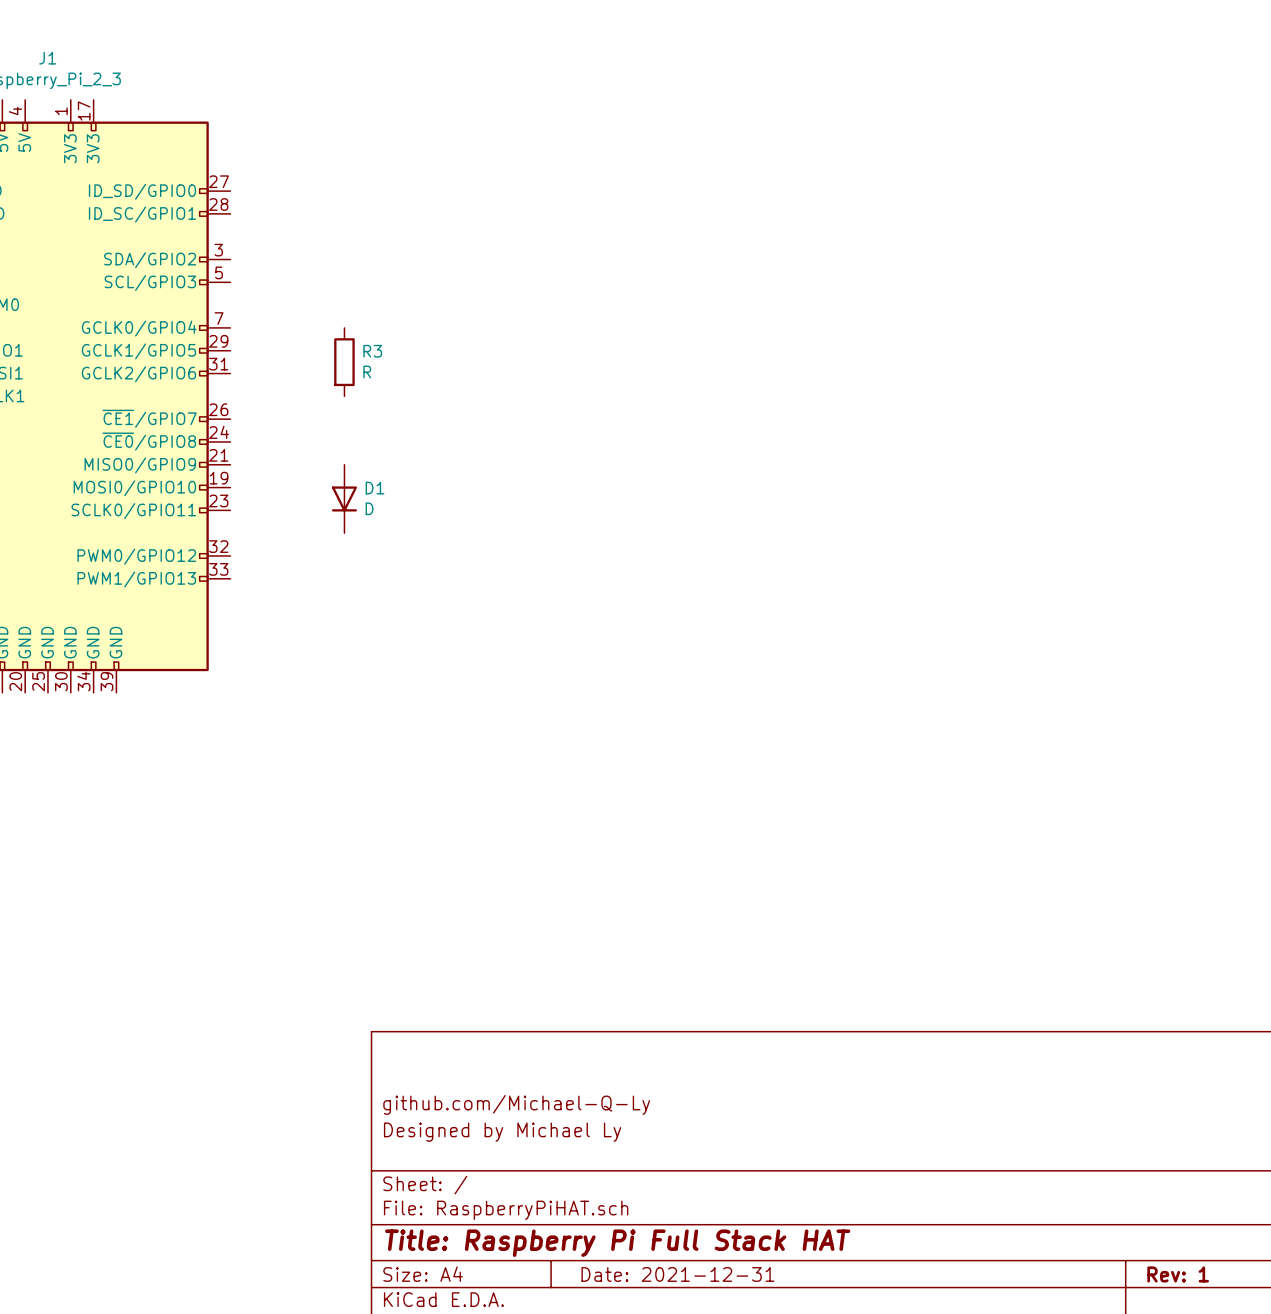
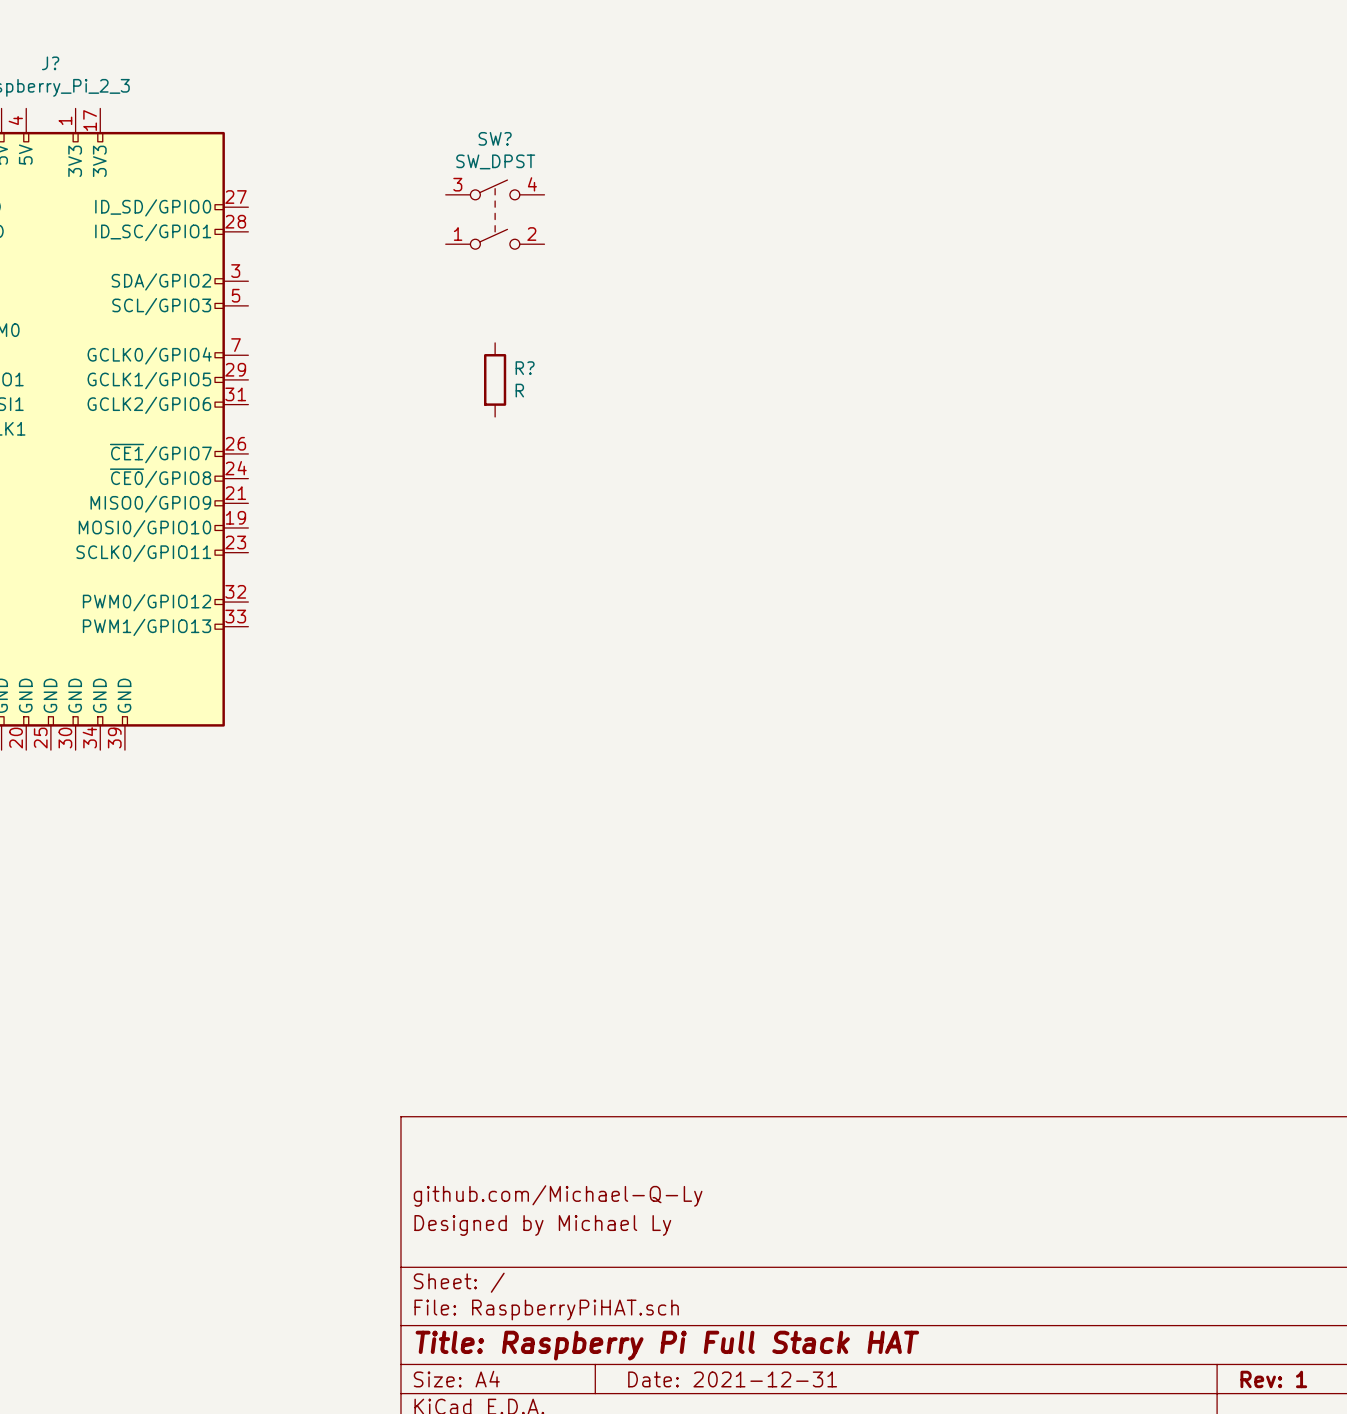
J1 name: J1 (47, 58) -> J? (50, 63)
SW?: none -> SW_DPST (495, 214)
R?: none -> R (495, 379)
R3: R (344, 362) -> none
D1: D (344, 498) -> none

